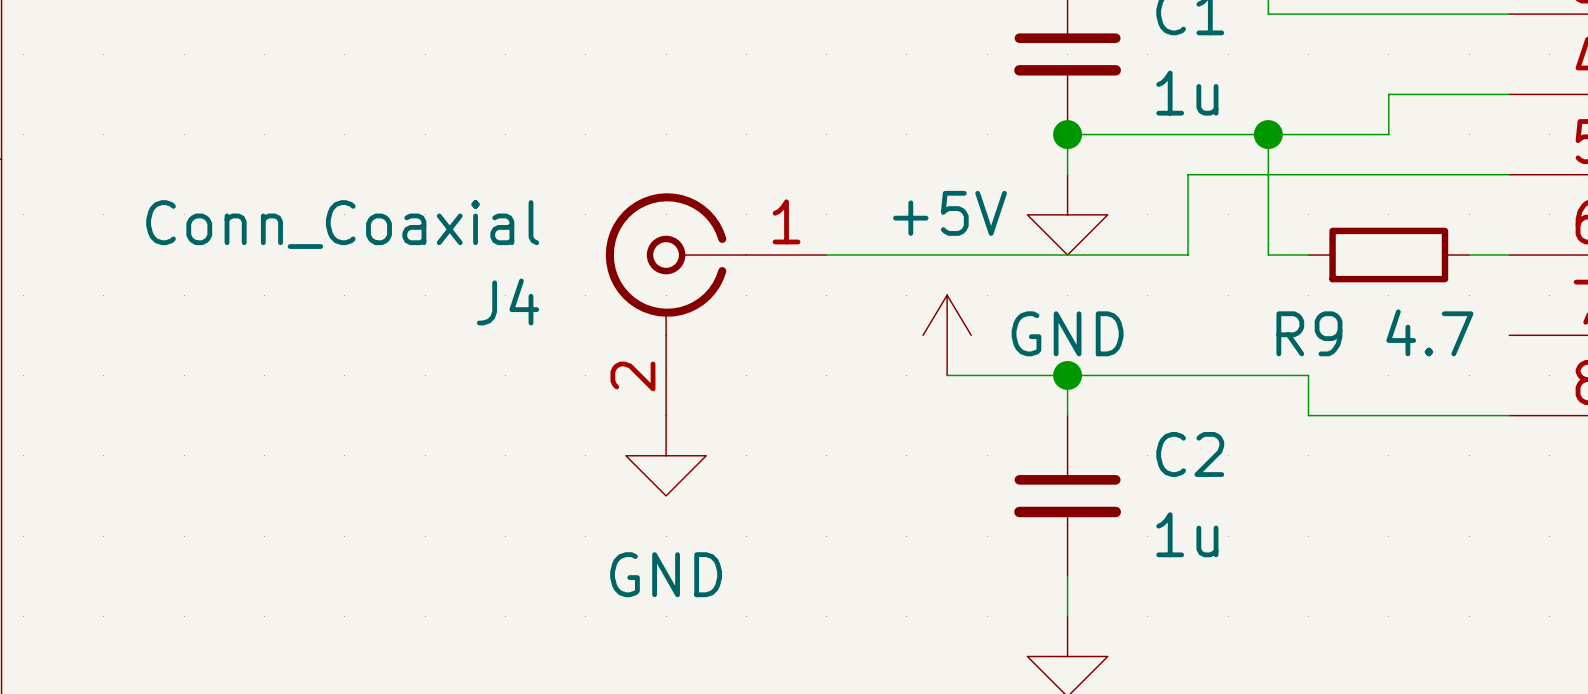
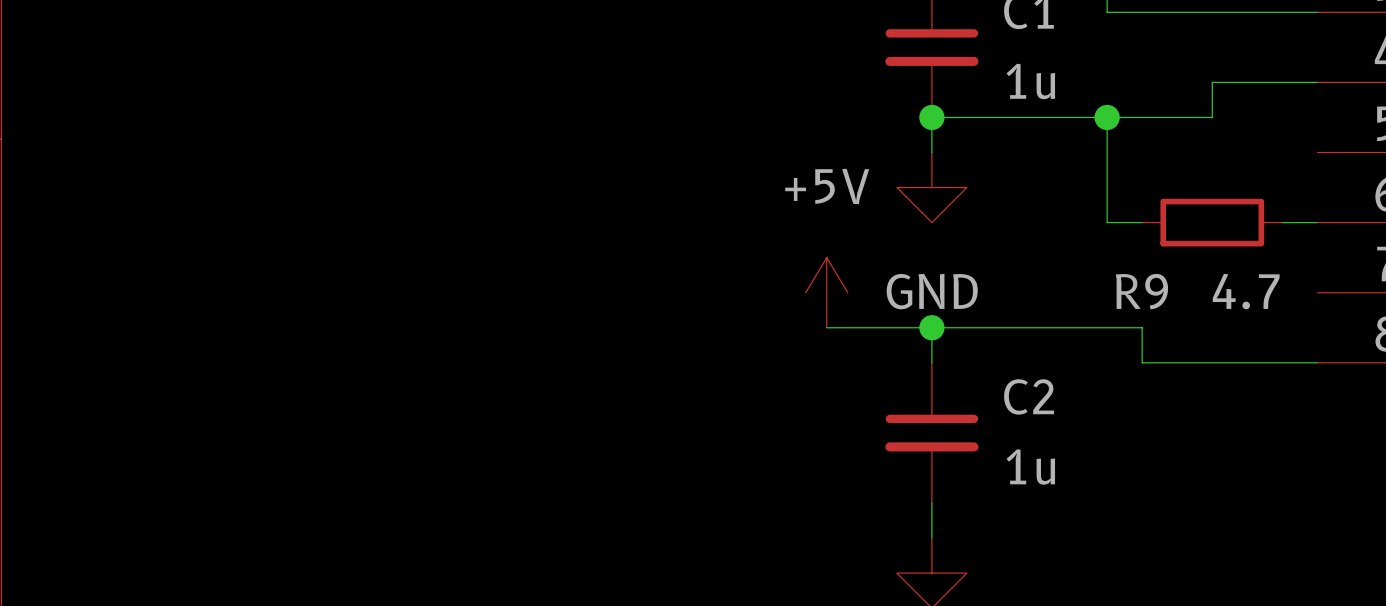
wire: (1509, 174) (1188, 174) (1188, 255) (826, 255) -> none
J4: Conn_Coaxial (716, 304) -> none
power symbol: GND (666, 455) -> none

